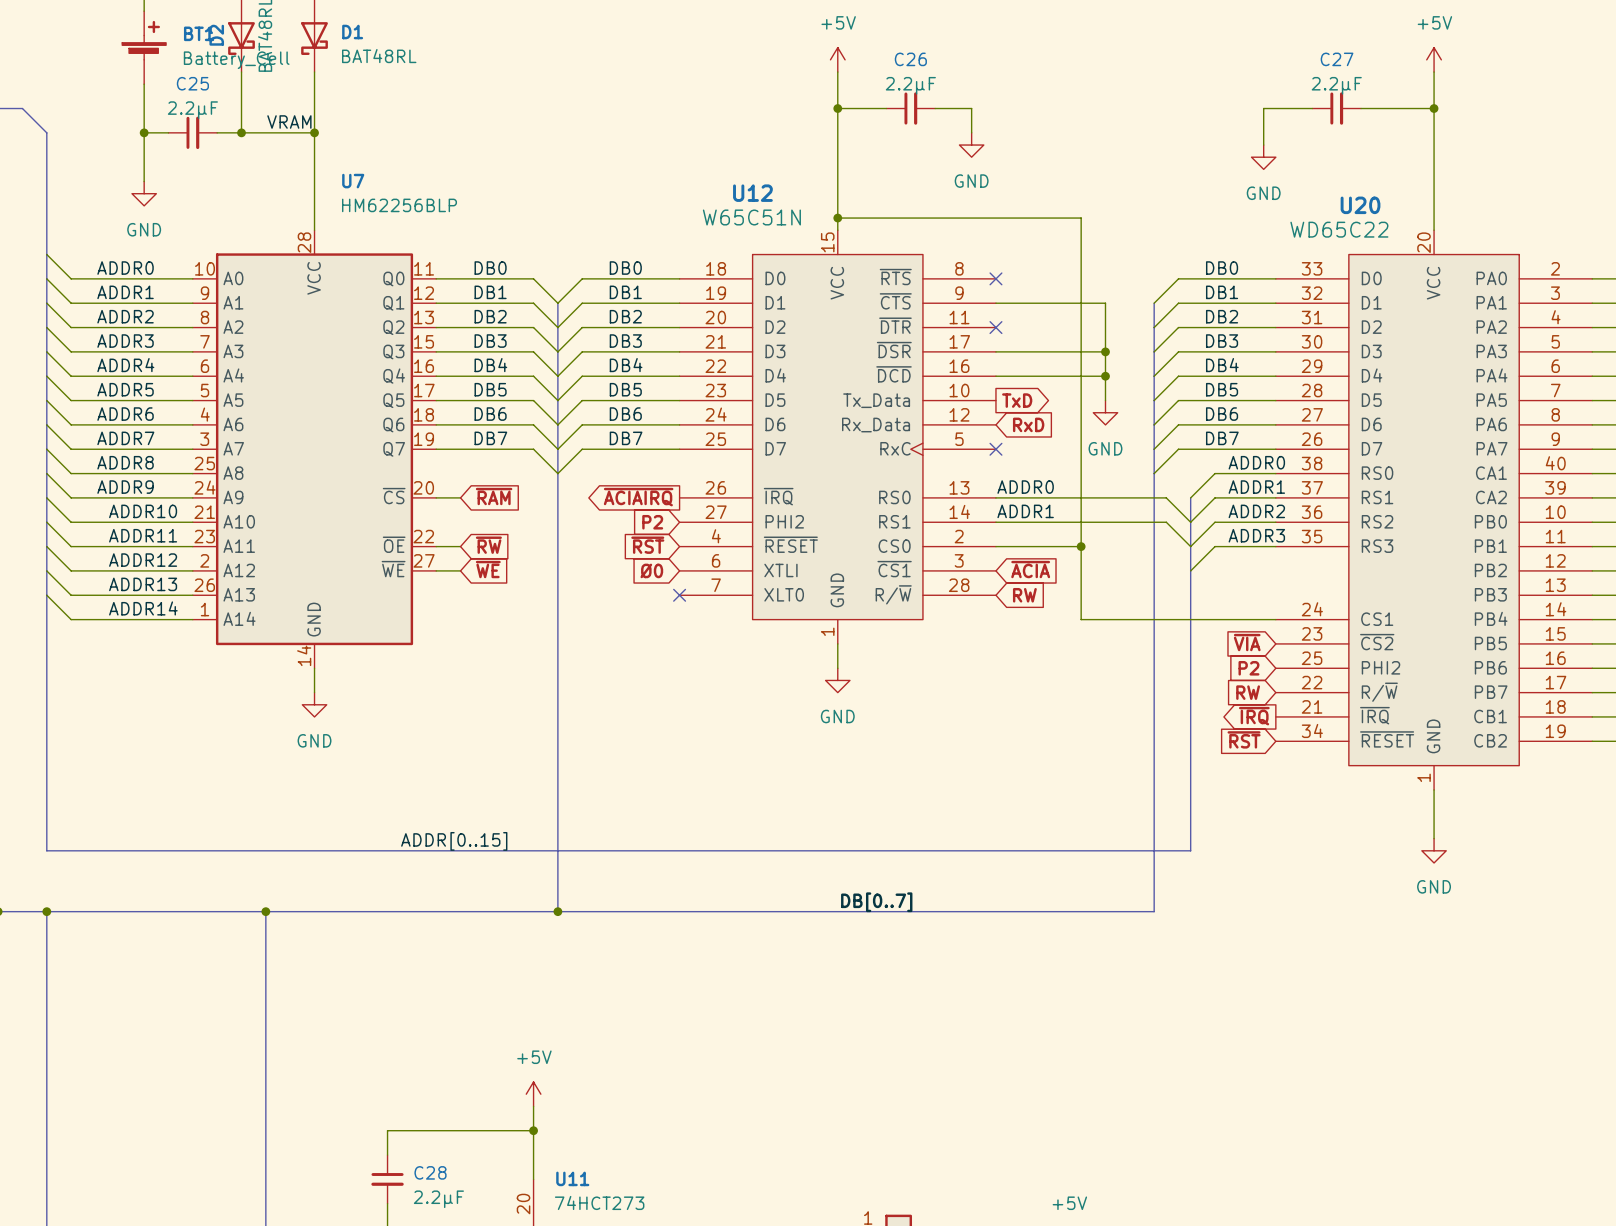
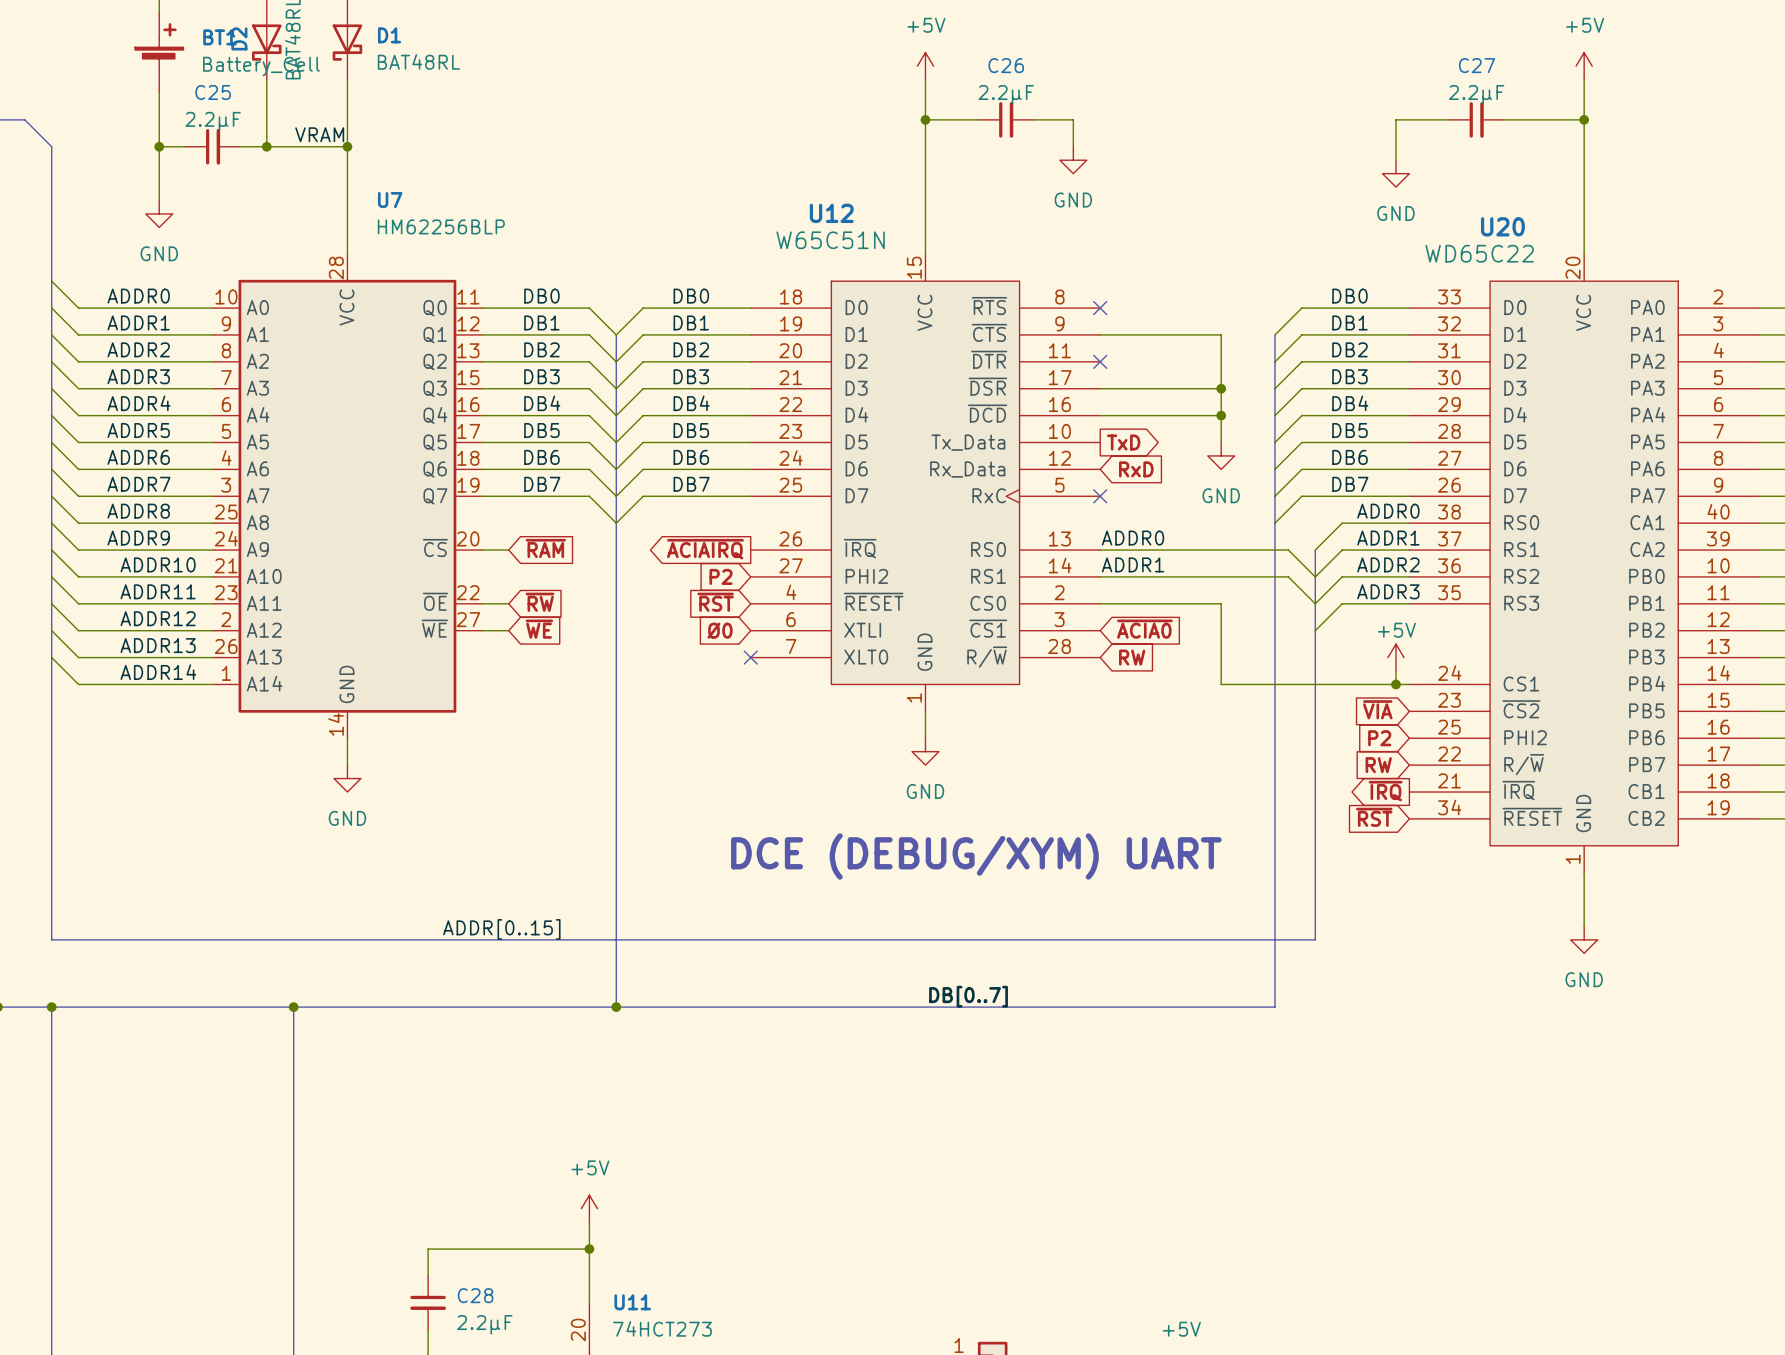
wire: (837, 218) (1081, 218) (1081, 619) (1105, 619) -> (1194, 603) (1221, 603) (1221, 684)
junction: (837, 218) -> none
junction: (1081, 546) -> none
global label: ~{ACIA} (1030, 569) -> ~{ACIA0} (1144, 629)
power symbol: none -> +5V (1395, 657)
wire: none -> (1395, 671) (1395, 684)
junction: none -> (1395, 684)
text: none -> DCE (DEBUG/XYM) UART (976, 856)

